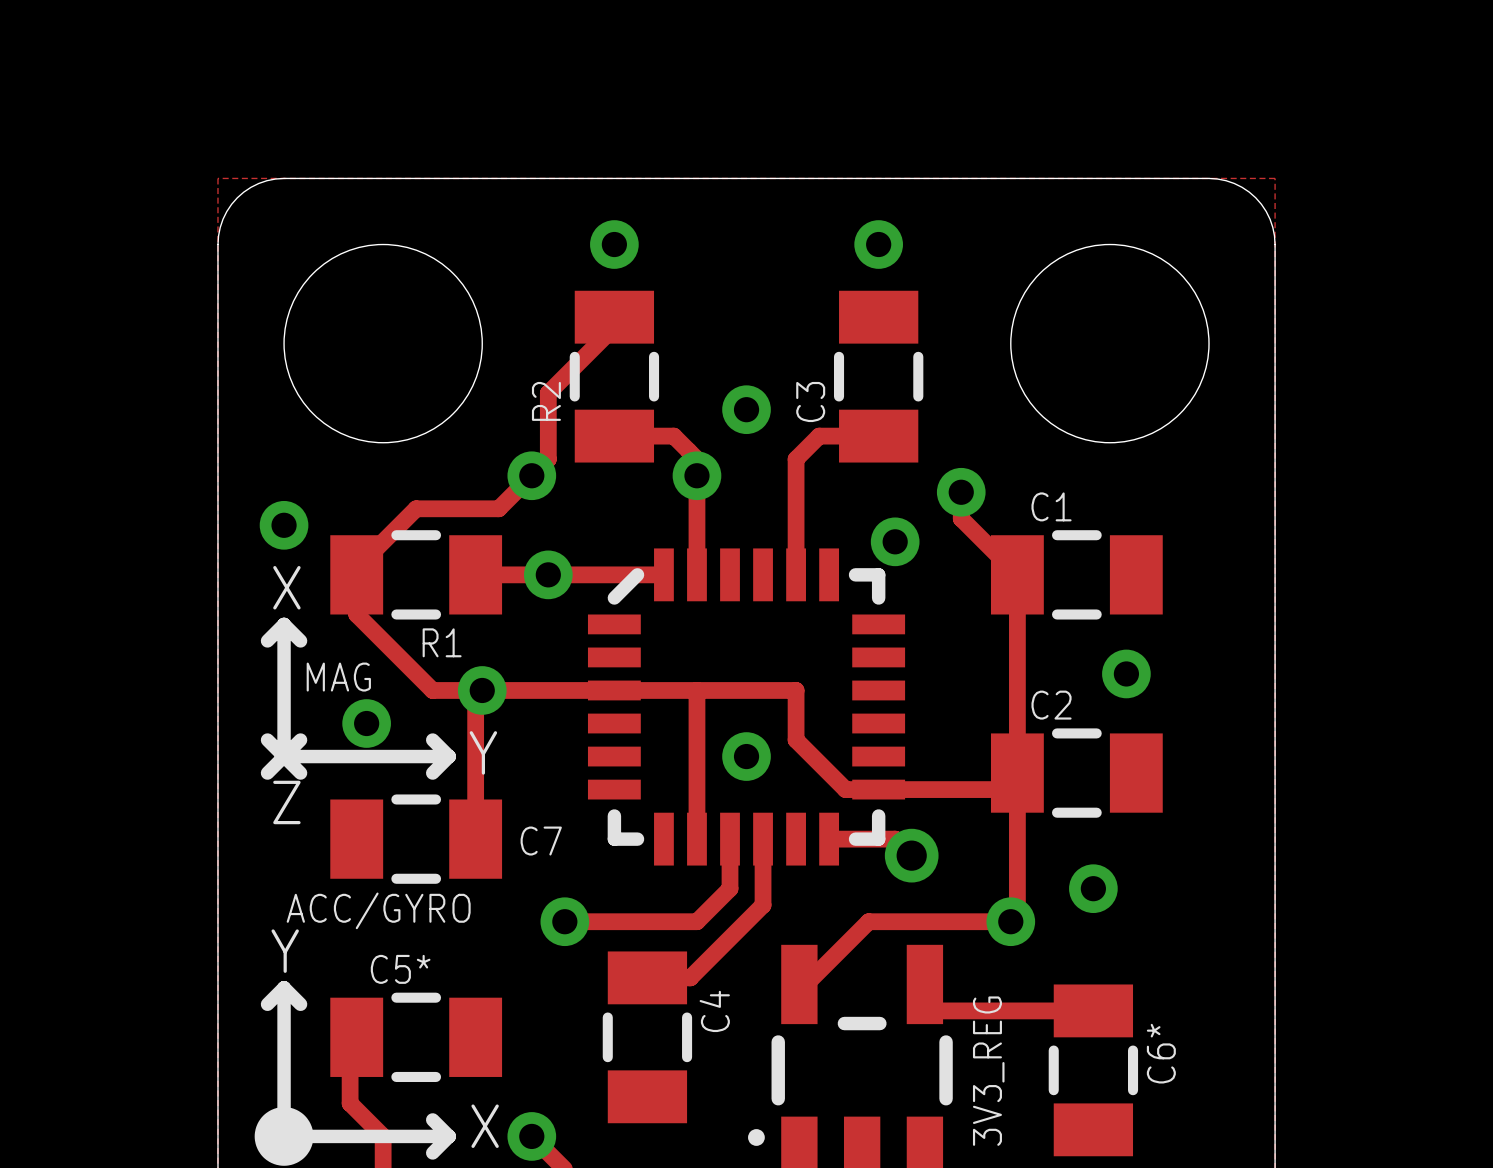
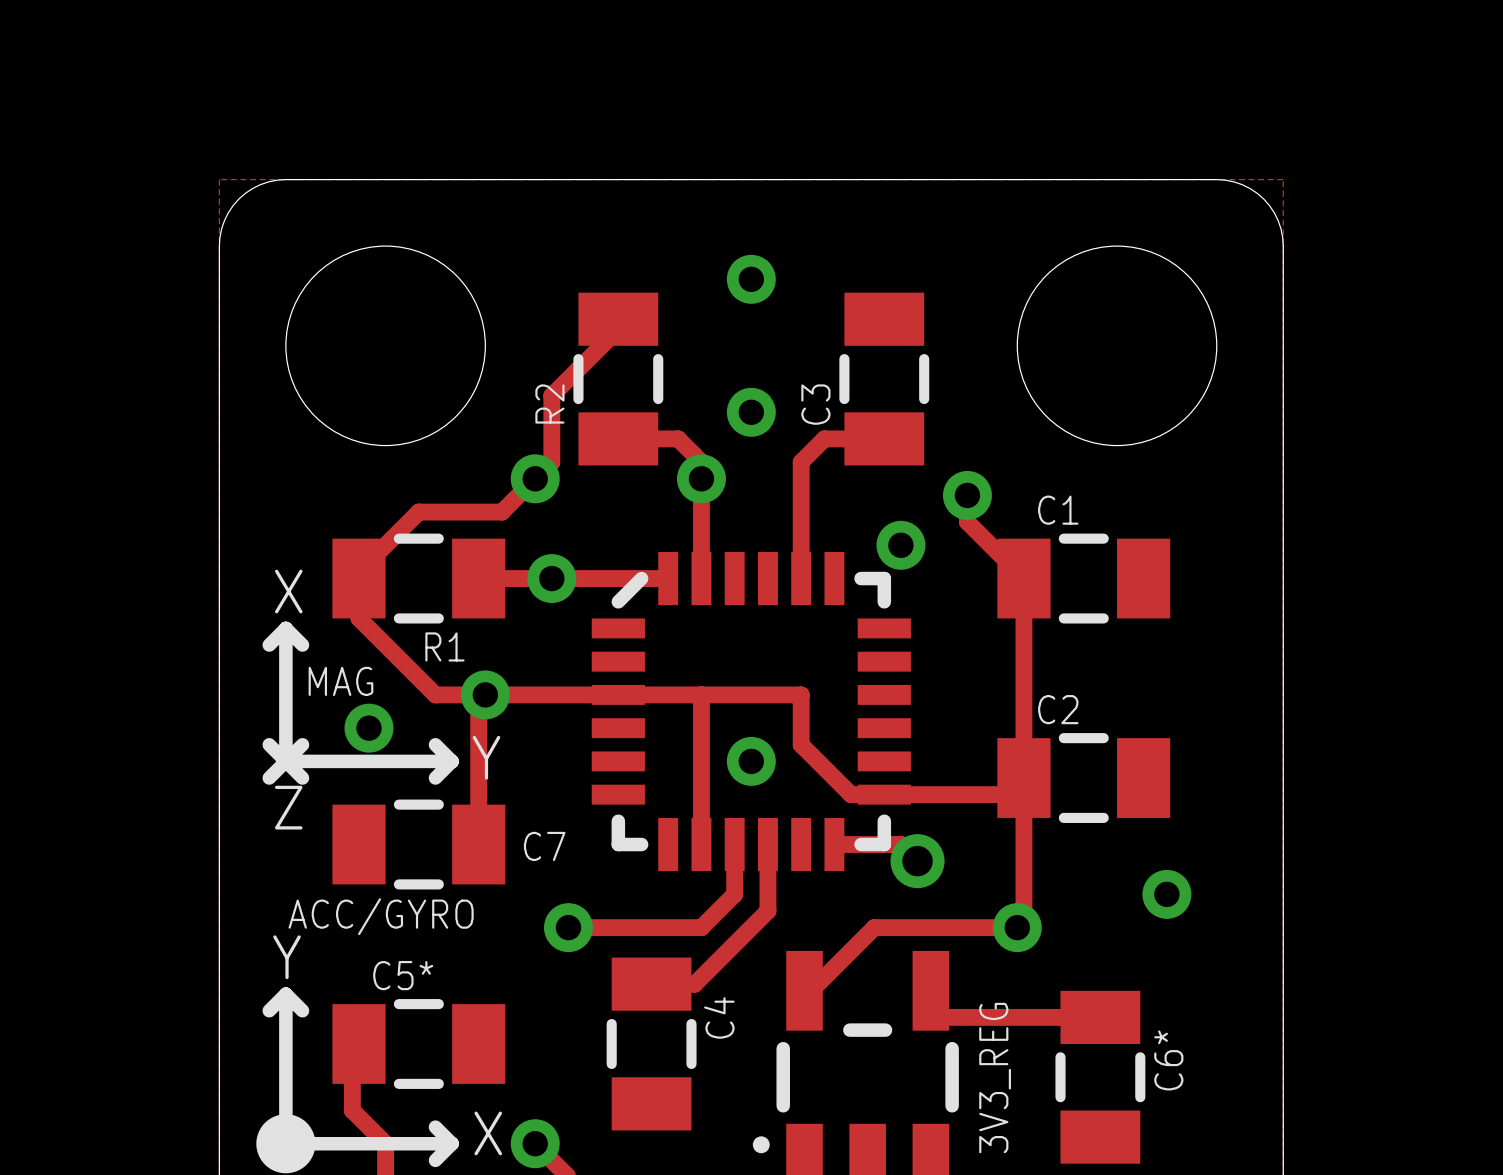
via: (614, 244) -> none
via: (878, 244) -> none
via: none -> (751, 279)
via: (284, 525) -> none
via: (1126, 673) -> none
via position: (1093, 888) -> (1166, 894)

